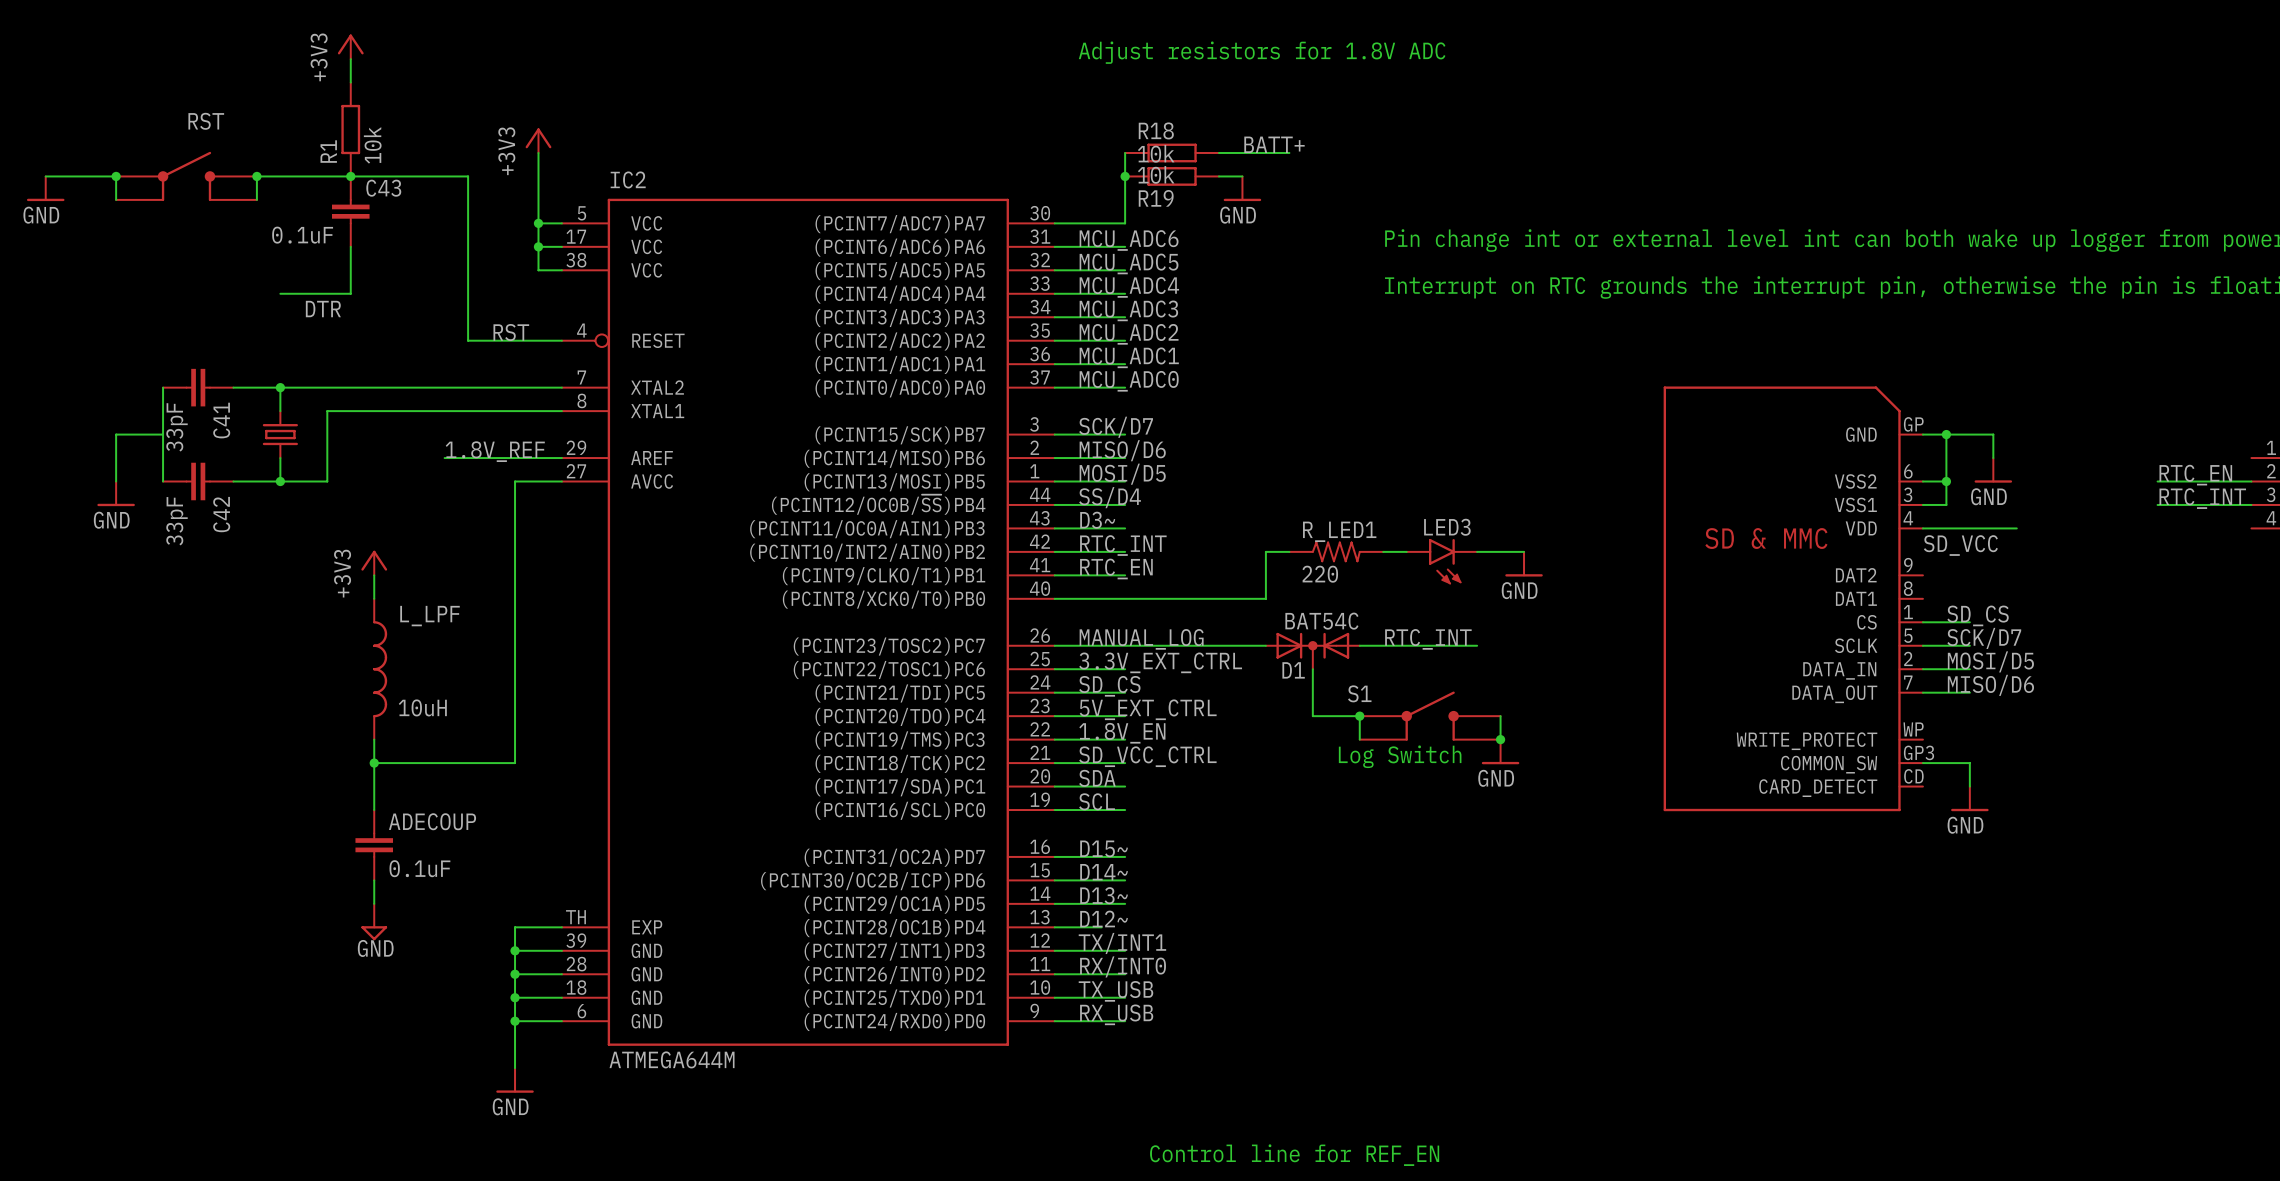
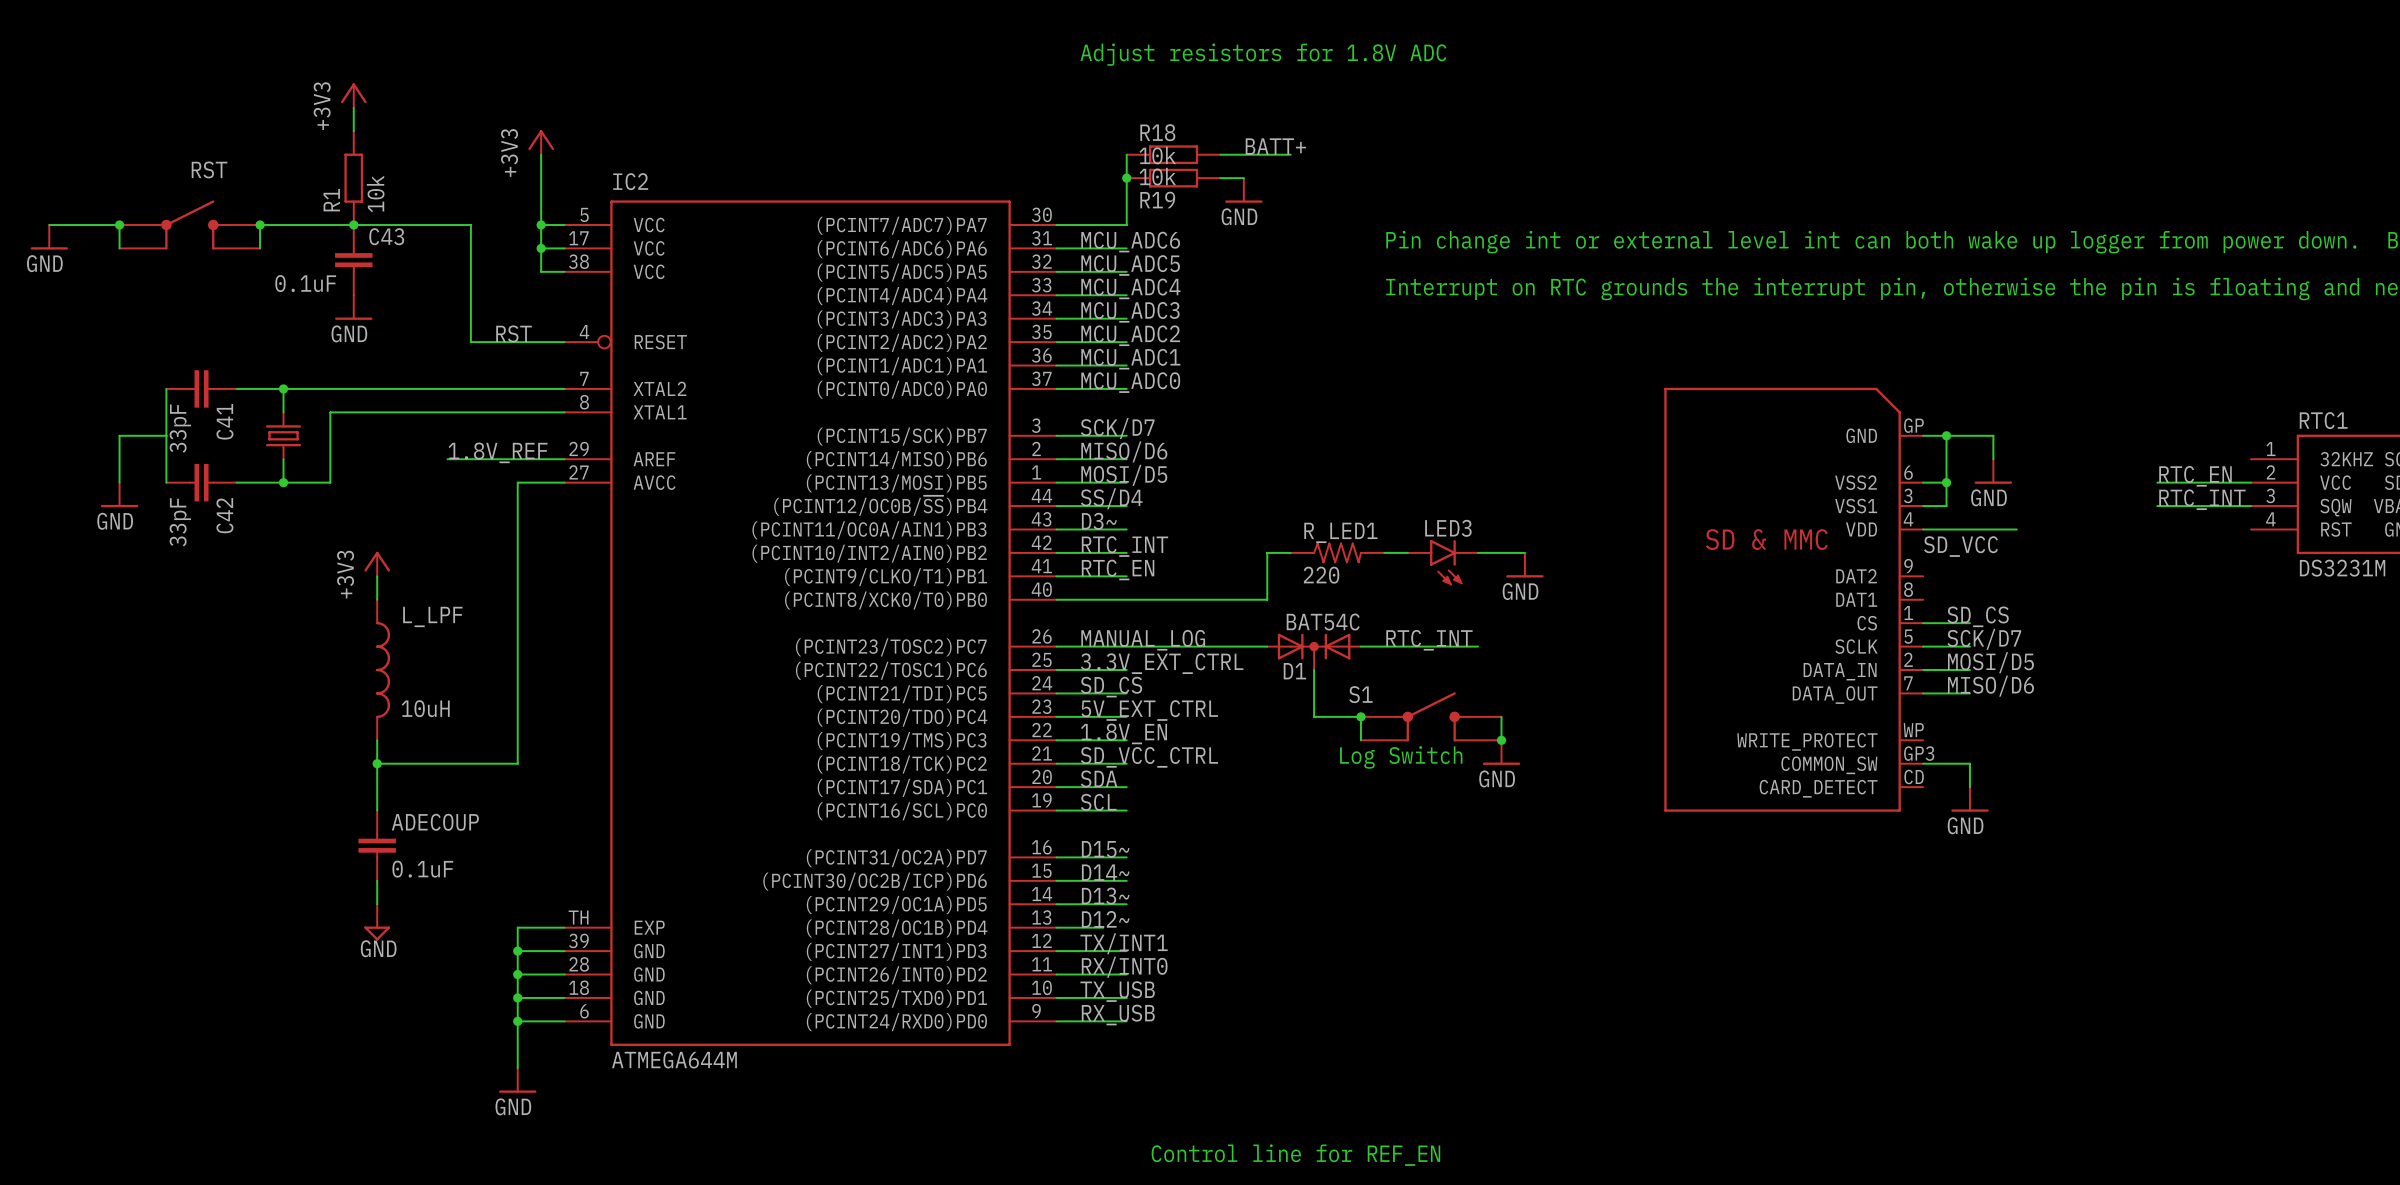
power symbol position: +3V3 (350, 46) -> +3V3 (353, 95)
wire: (350, 59) (350, 82) -> (353, 107) (353, 131)
label position: RST (206, 121) -> RST (209, 169)
R1 position: (350, 129) -> (353, 178)
wire: (45, 176) (116, 176) (116, 199) -> (49, 224) (119, 224) (119, 248)
junction position: (116, 176) -> (119, 224)
part position: (186, 176) -> (189, 224)
junction position: (256, 176) -> (260, 224)
junction position: (350, 176) -> (353, 224)
power symbol position: GND (45, 188) -> GND (49, 237)
wire: (256, 199) (256, 176) (468, 176) (468, 223) -> (260, 248) (260, 224) (470, 224)
C43 position: (350, 211) -> (353, 260)
wire: (350, 246) (350, 293) (280, 293) -> none
power symbol: none -> GND (353, 307)
label: DTR (323, 309) -> none

